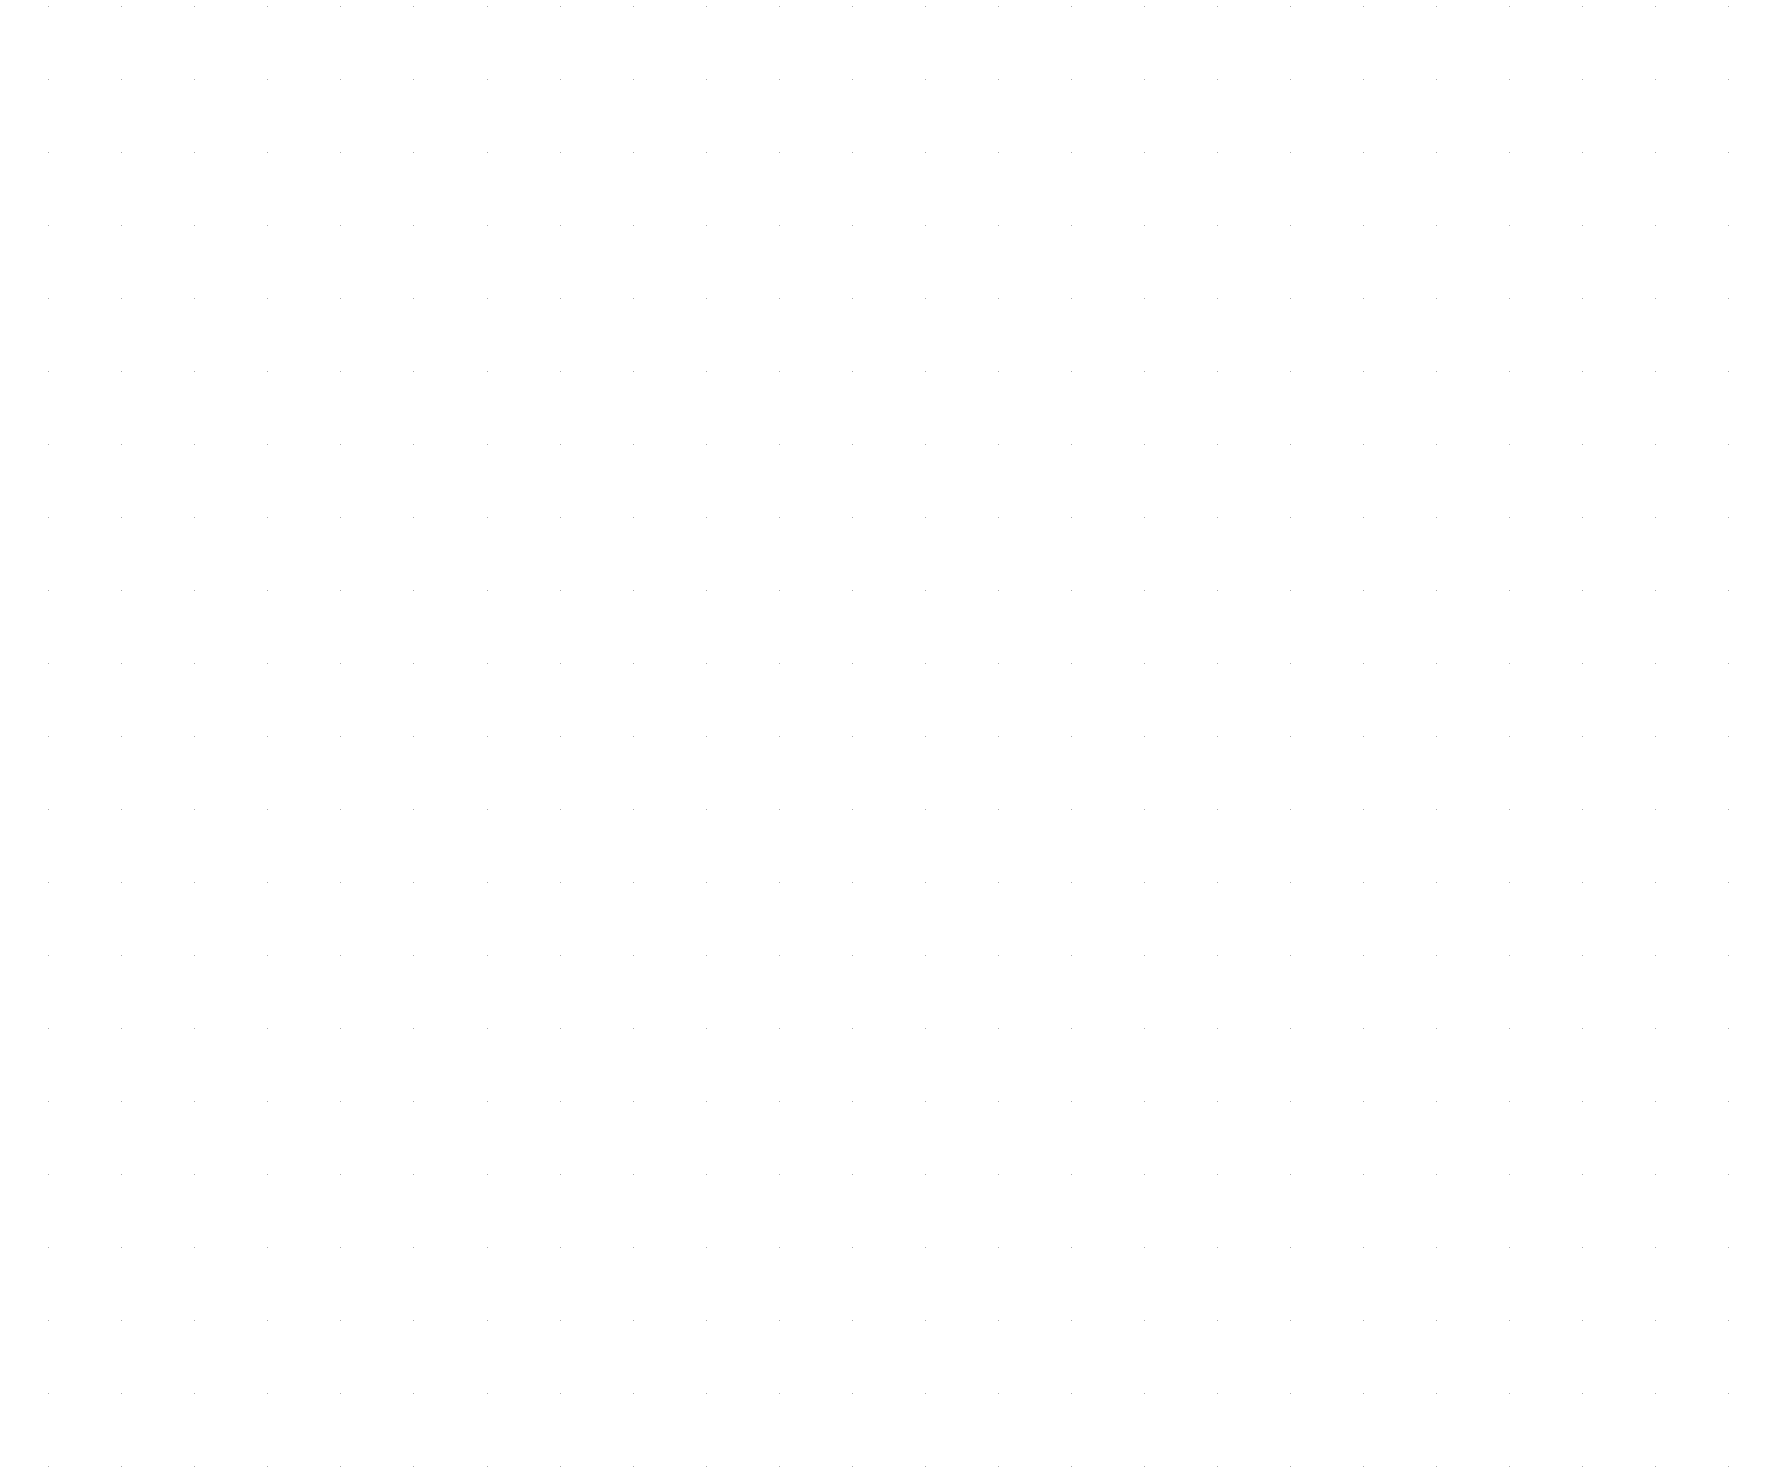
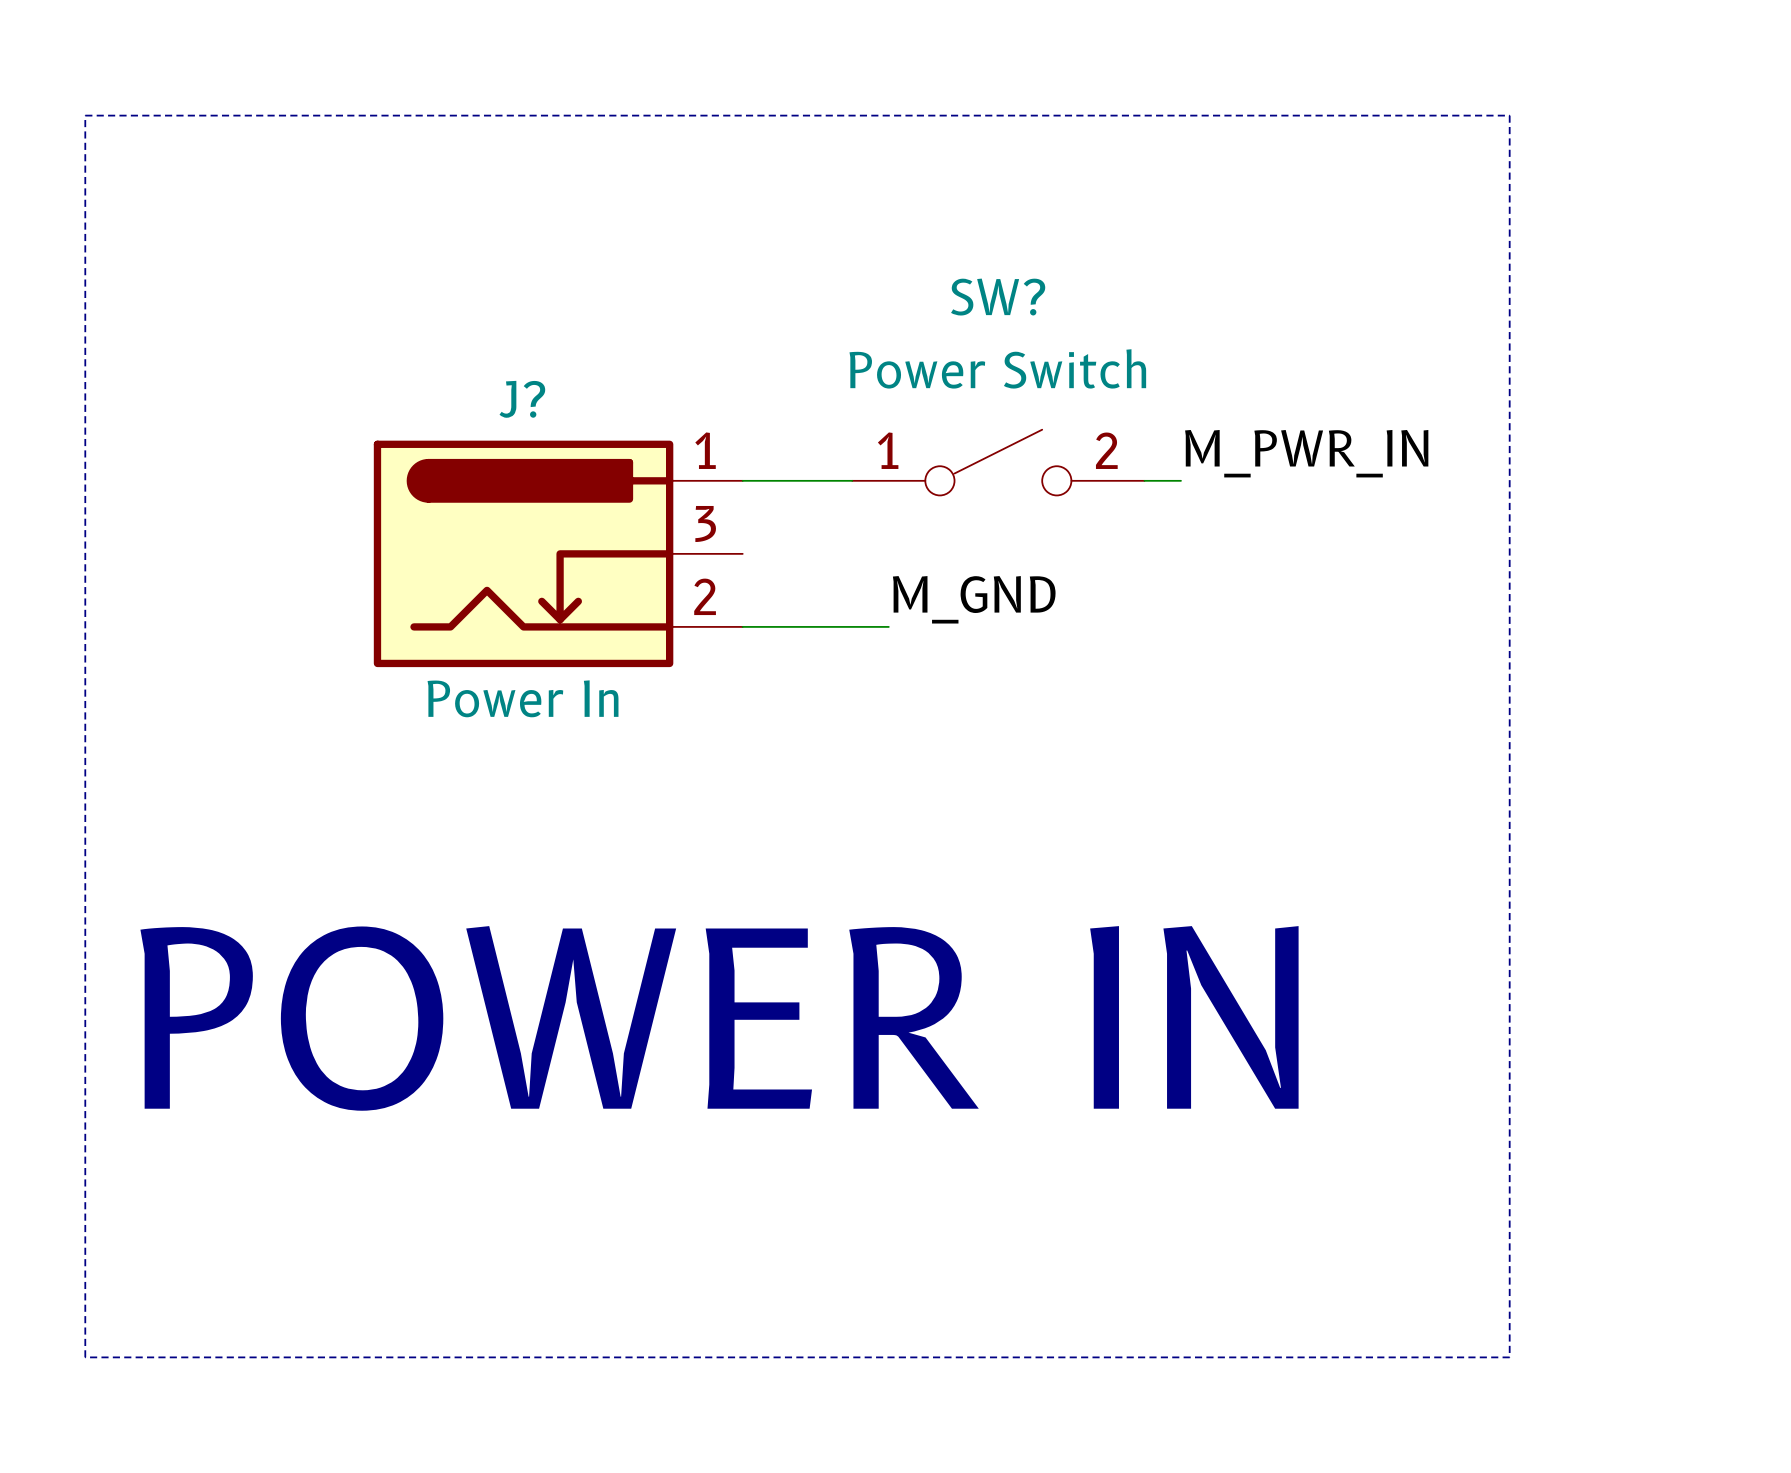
line: none -> (85, 115) (1509, 115) (1509, 1357) (85, 1357) (85, 115)
label: none -> M_PWR_IN (1306, 453)
SW?: none -> Power Switch (998, 462)
wire: none -> (742, 480) (852, 480)
wire: none -> (1144, 480) (1180, 480)
J?: none -> Power In (558, 553)
label: none -> M_GND (974, 599)
wire: none -> (742, 626) (888, 626)
text: none -> POWER IN (719, 1018)

